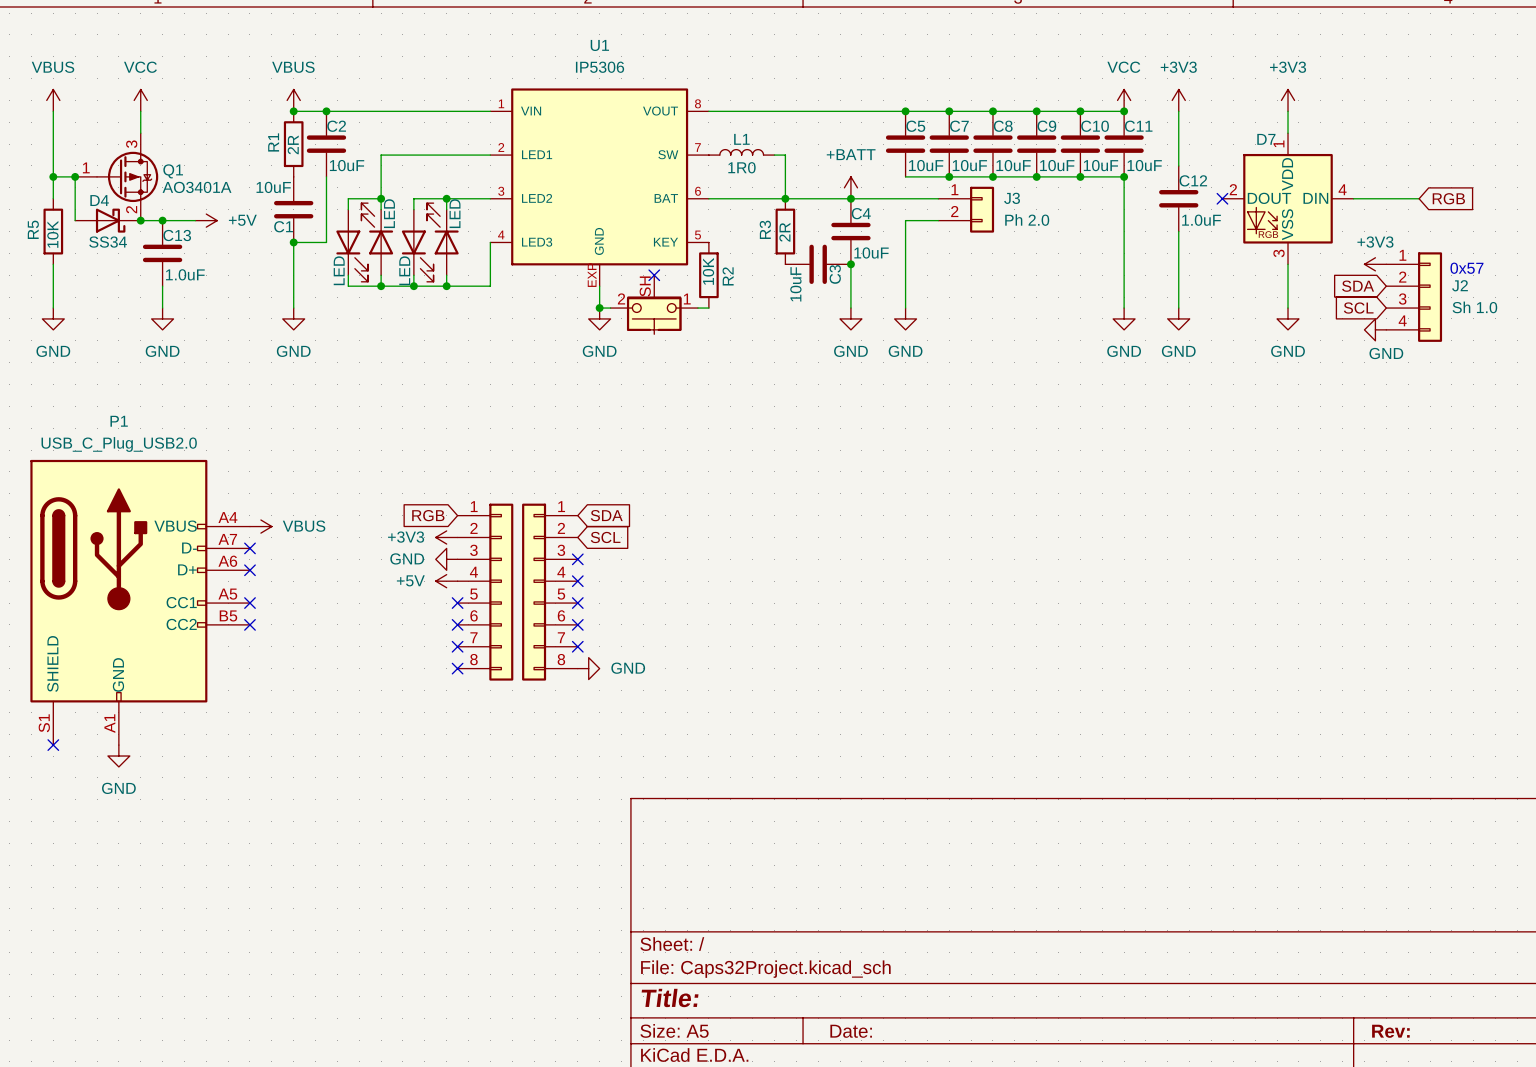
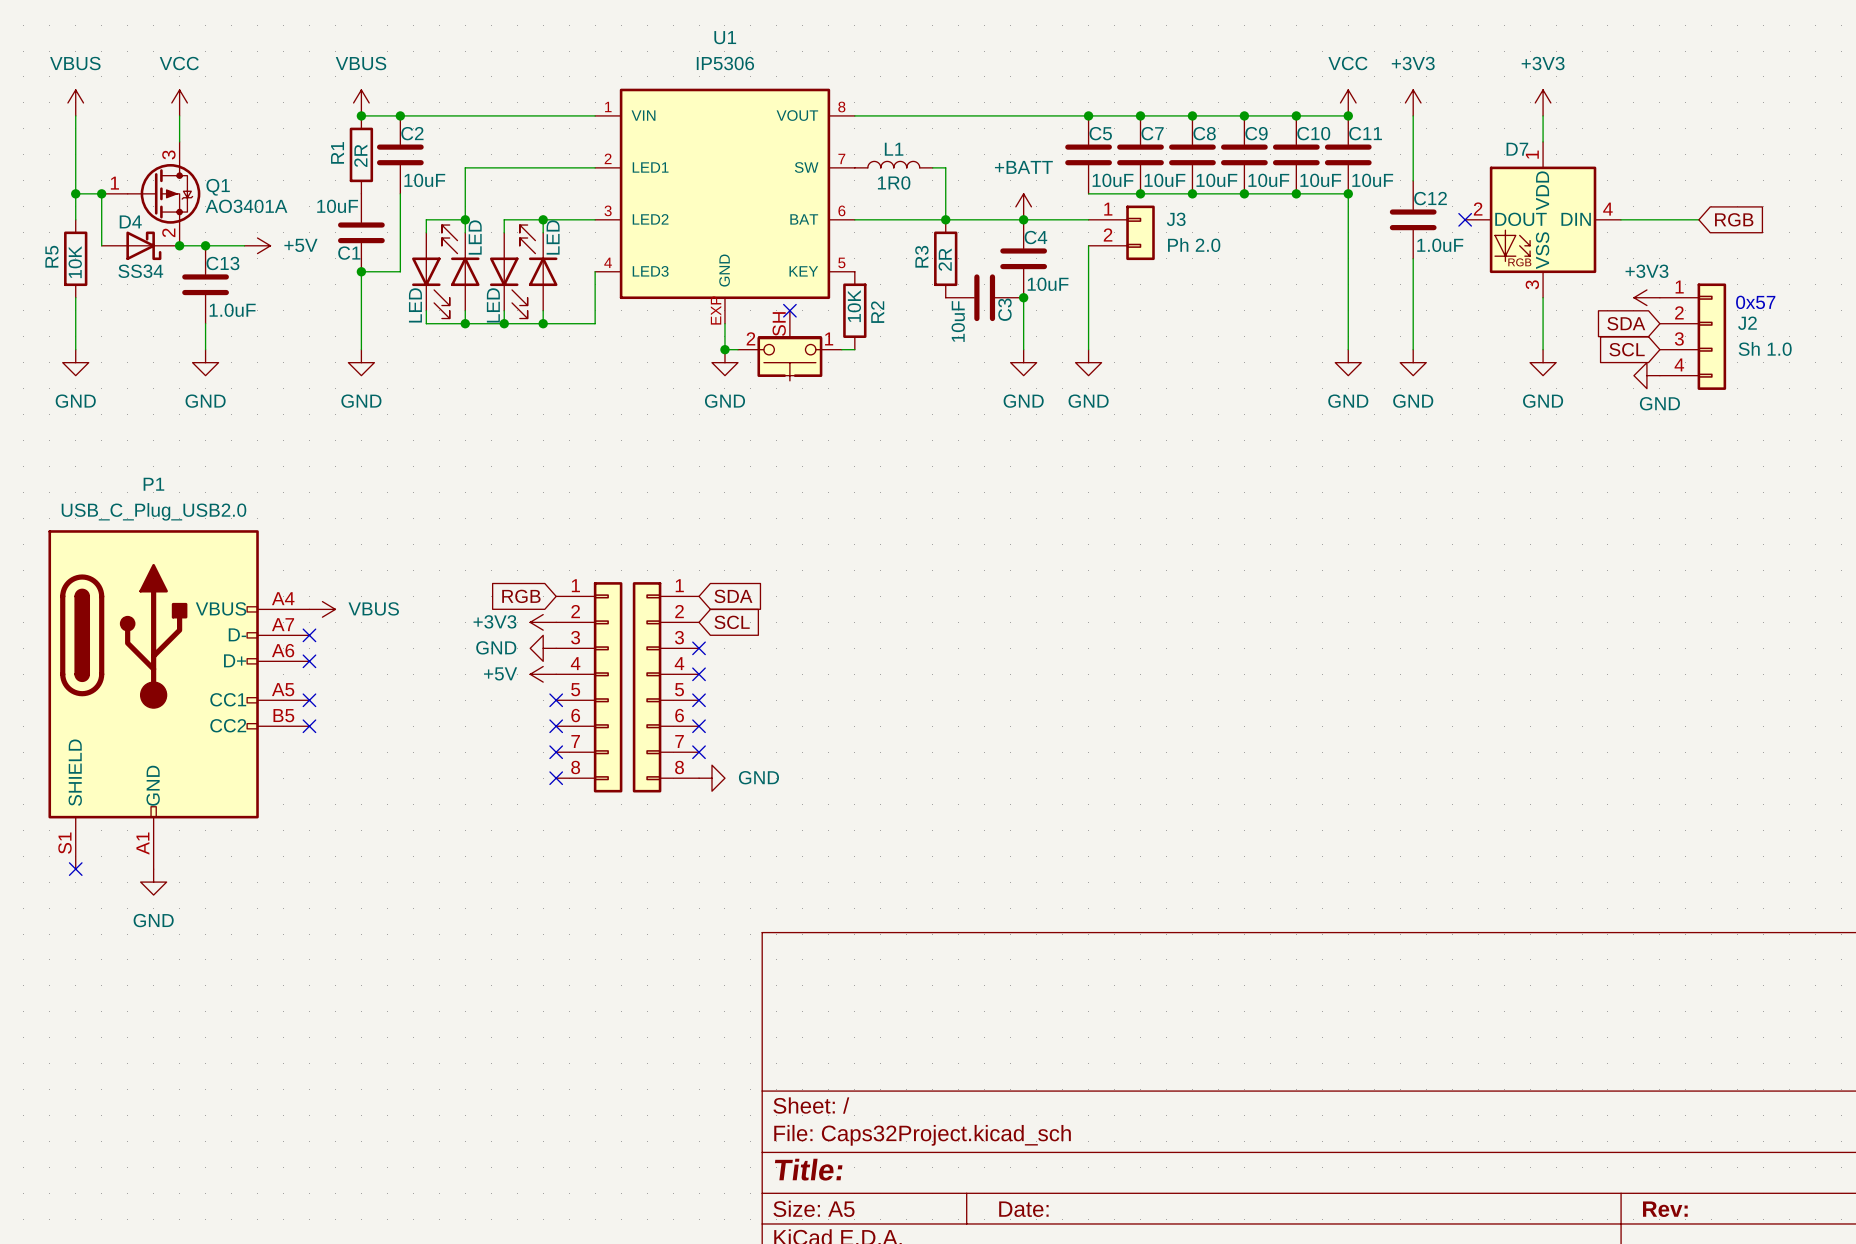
J3 position: (966, 209) -> (1121, 232)

